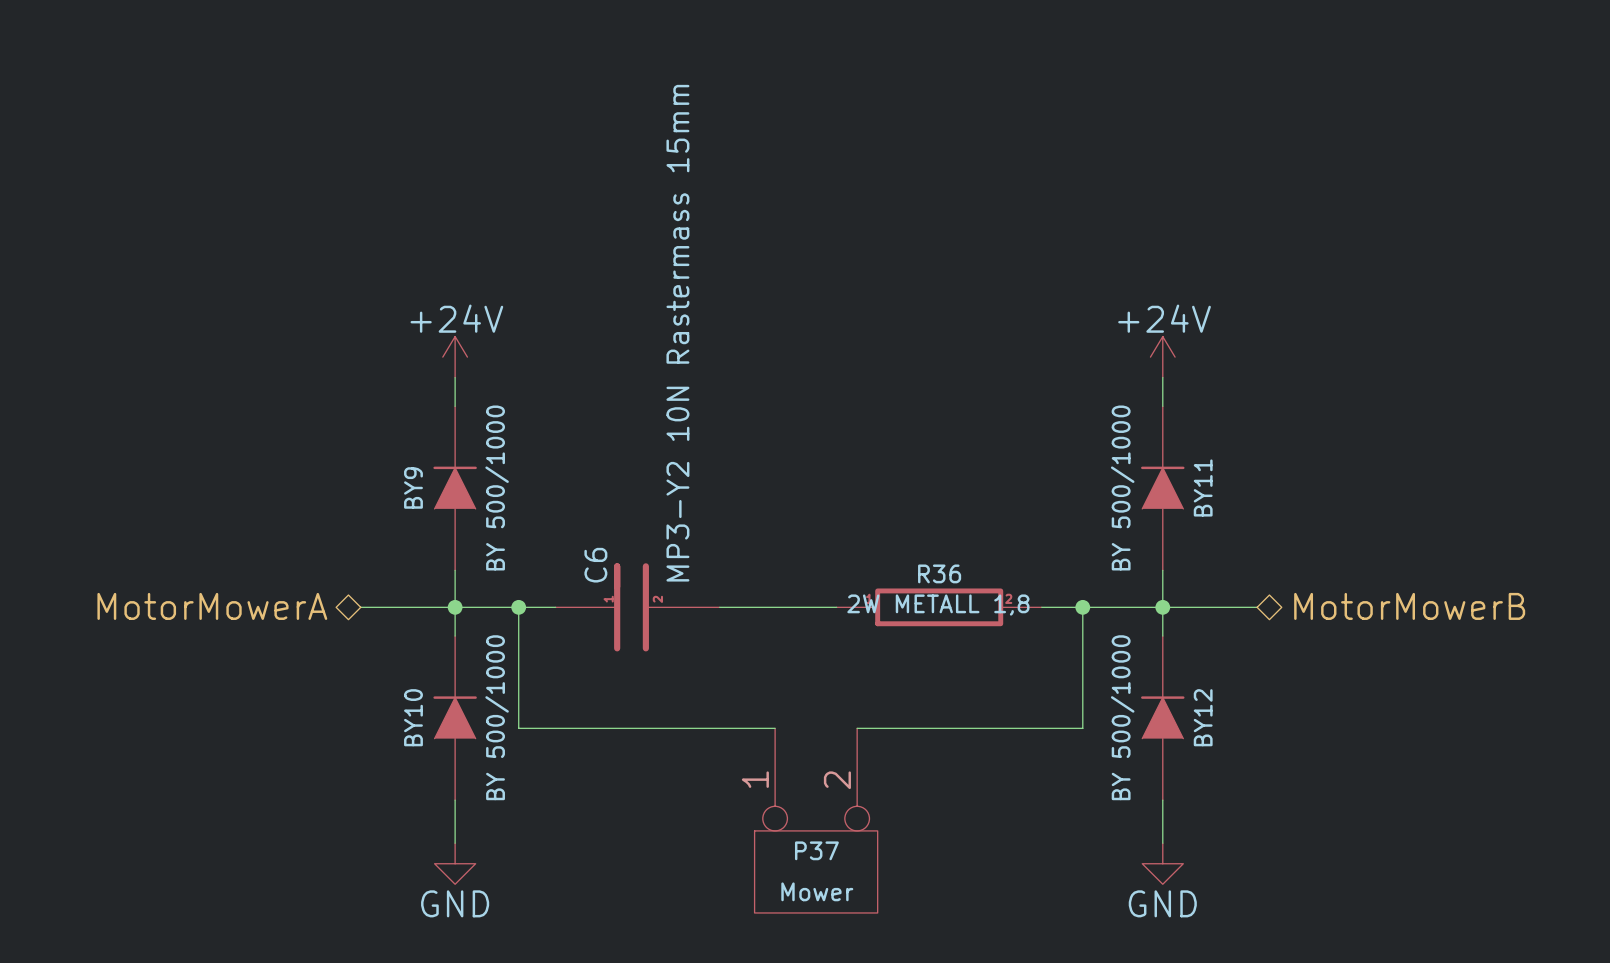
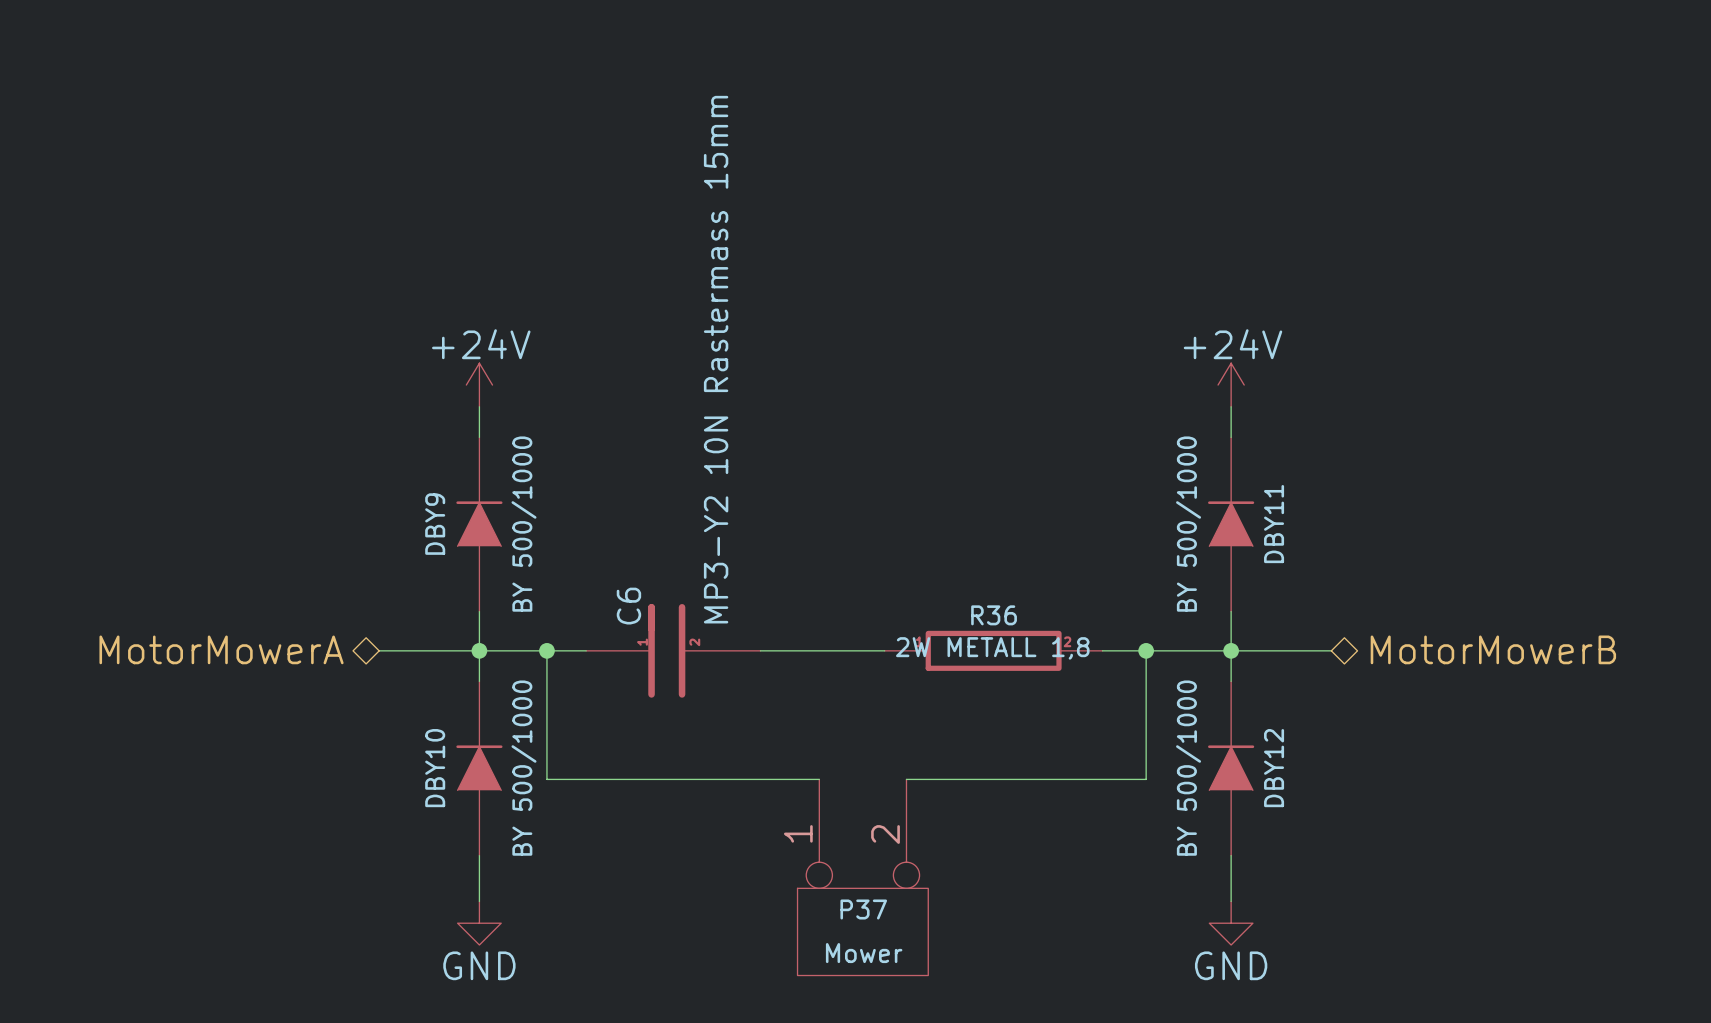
BY9 name: BY9 (413, 487) -> DBY9 (435, 524)
BY11 name: BY11 (1203, 487) -> DBY11 (1274, 524)
BY10 name: BY10 (413, 717) -> DBY10 (435, 768)
BY12 name: BY12 (1203, 717) -> DBY12 (1274, 768)

